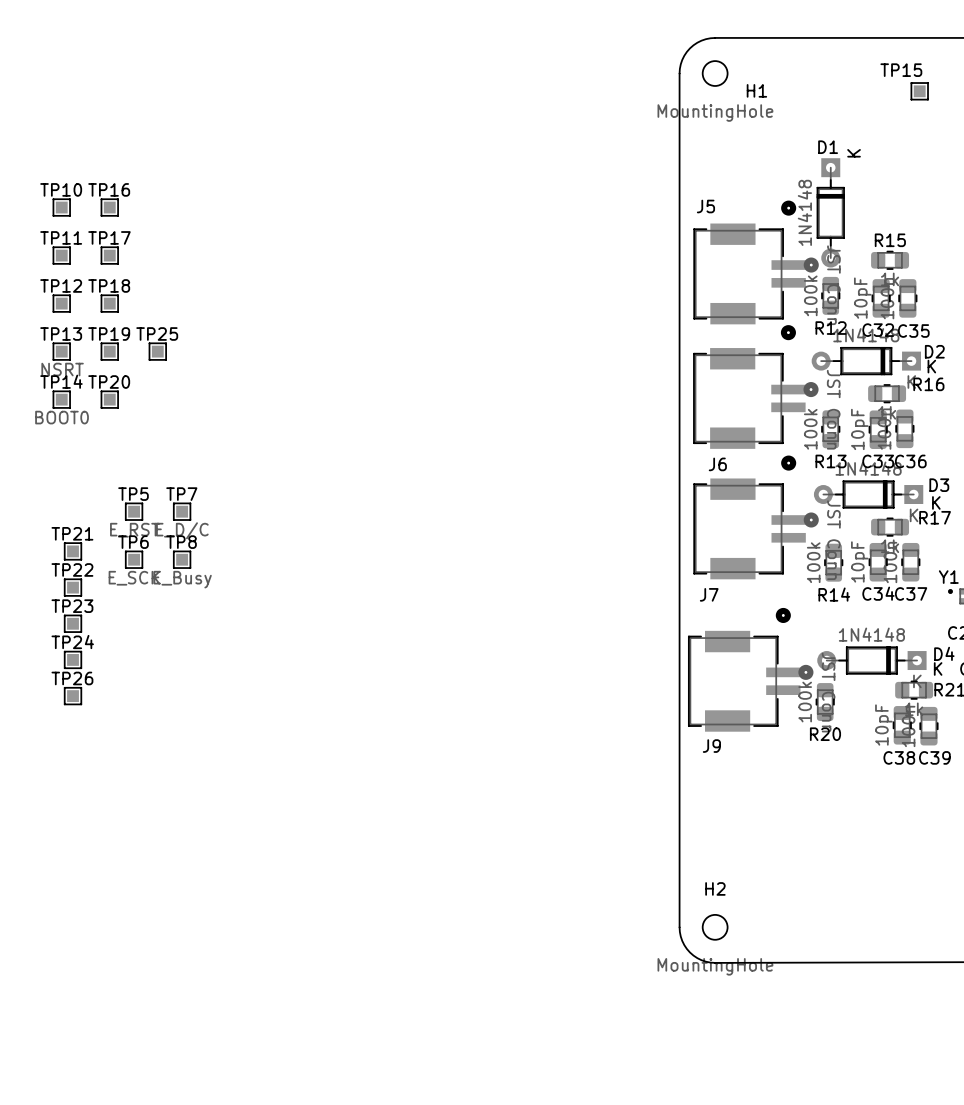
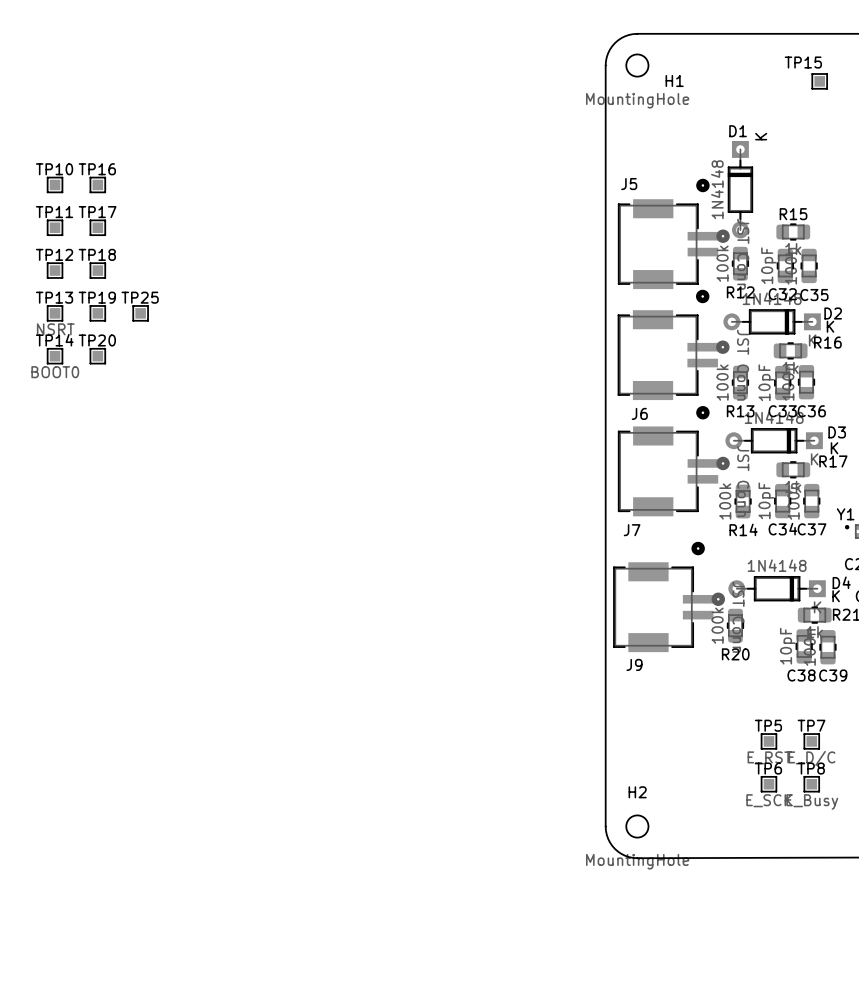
TP5 position: (134, 511) -> (768, 741)
TP7 position: (182, 511) -> (811, 741)
TP21: (73, 551) -> none
TP6 position: (134, 559) -> (768, 784)
TP8 position: (182, 559) -> (811, 784)
TP22: (73, 587) -> none
TP23: (73, 623) -> none
TP24: (73, 659) -> none
TP26: (73, 696) -> none

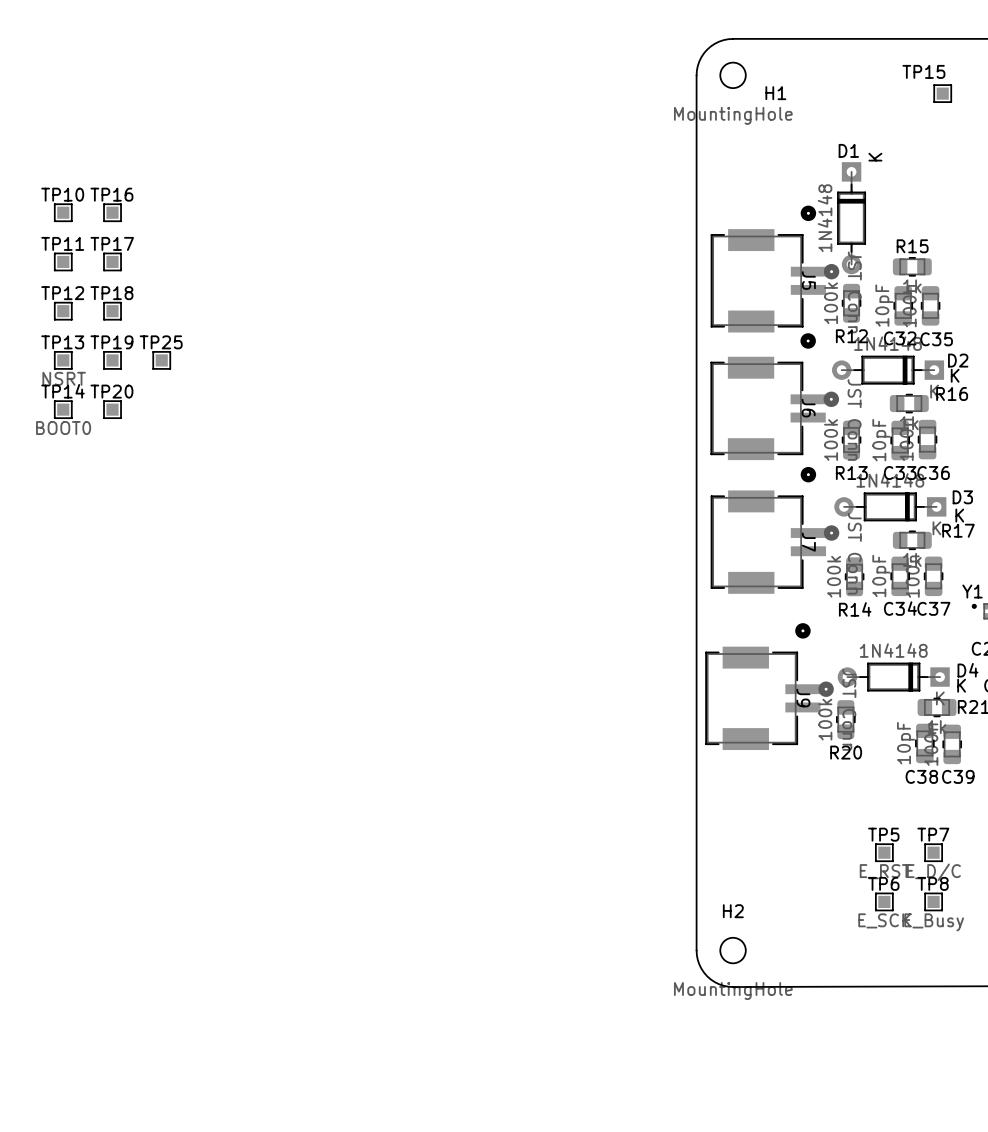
J5 name rotation: 0° (629, 184) -> 90° clockwise (808, 280)
J5 name position: J5 (629, 184) -> J5 (808, 280)
J6 name rotation: 0° (639, 413) -> 90° clockwise (808, 408)
J6 name position: J6 (639, 413) -> J6 (808, 408)
J7 name rotation: 0° (632, 530) -> 90° clockwise (808, 542)
J7 name position: J7 (632, 530) -> J7 (808, 542)
J9 name rotation: 0° (634, 664) -> 90° clockwise (803, 698)
J9 name position: J9 (634, 664) -> J9 (803, 698)

